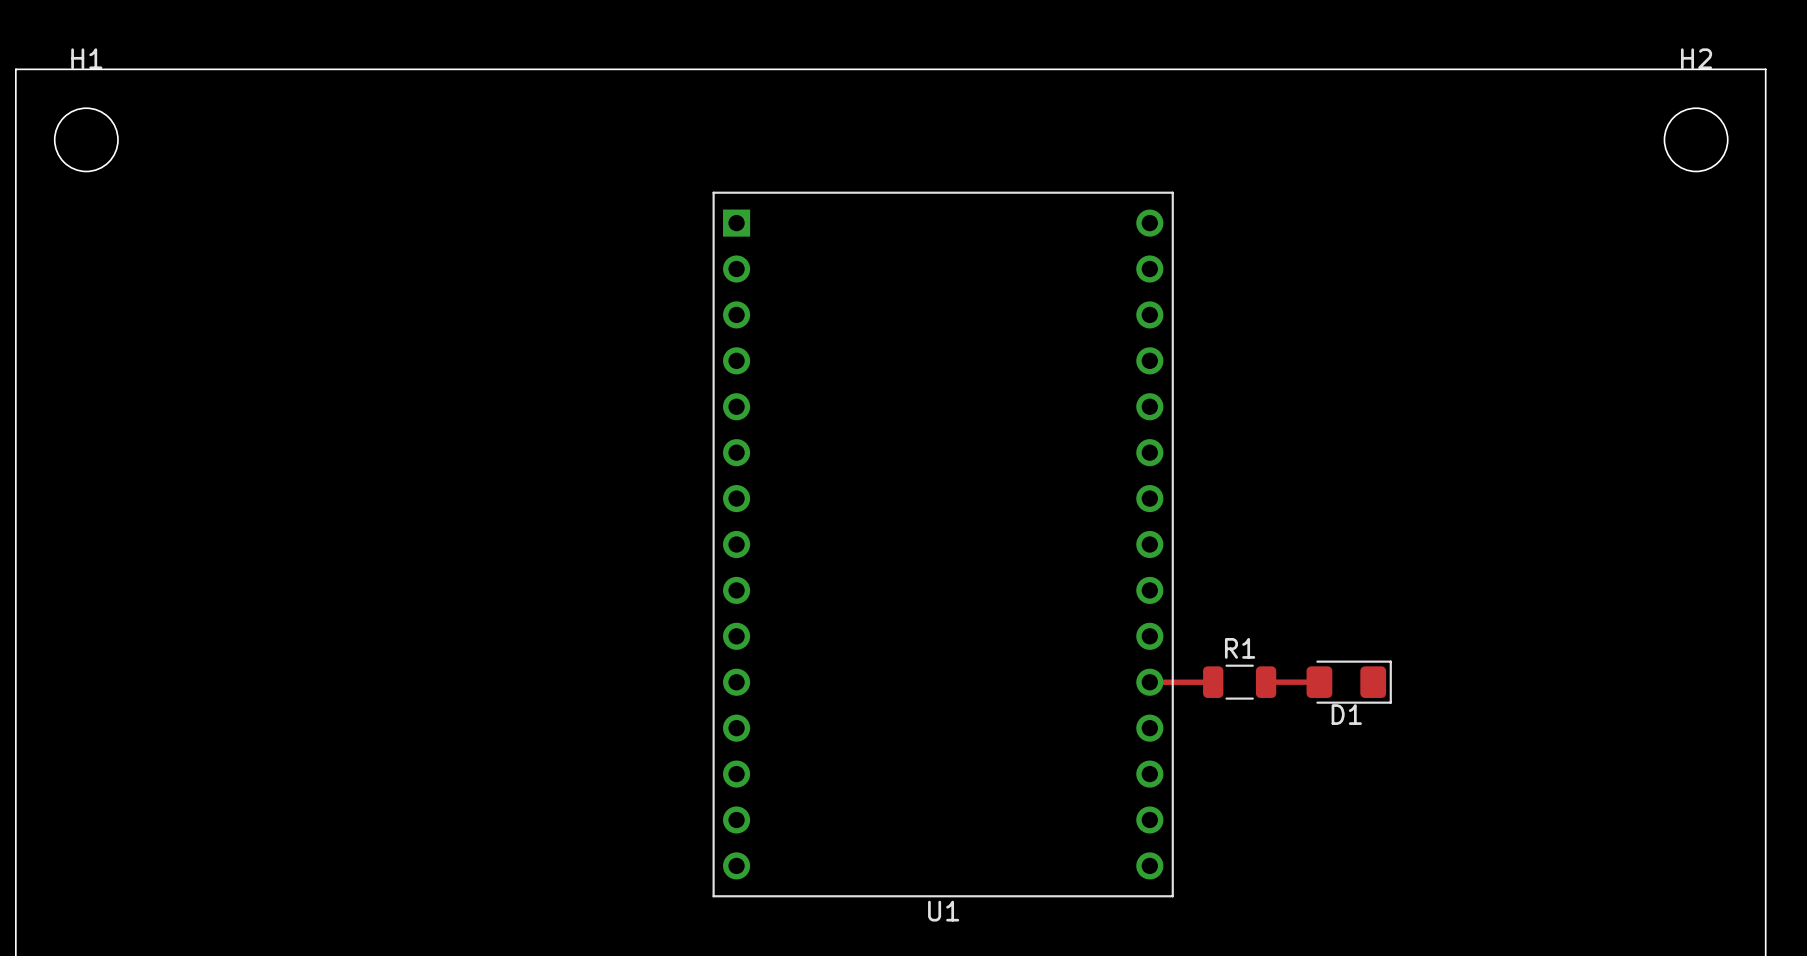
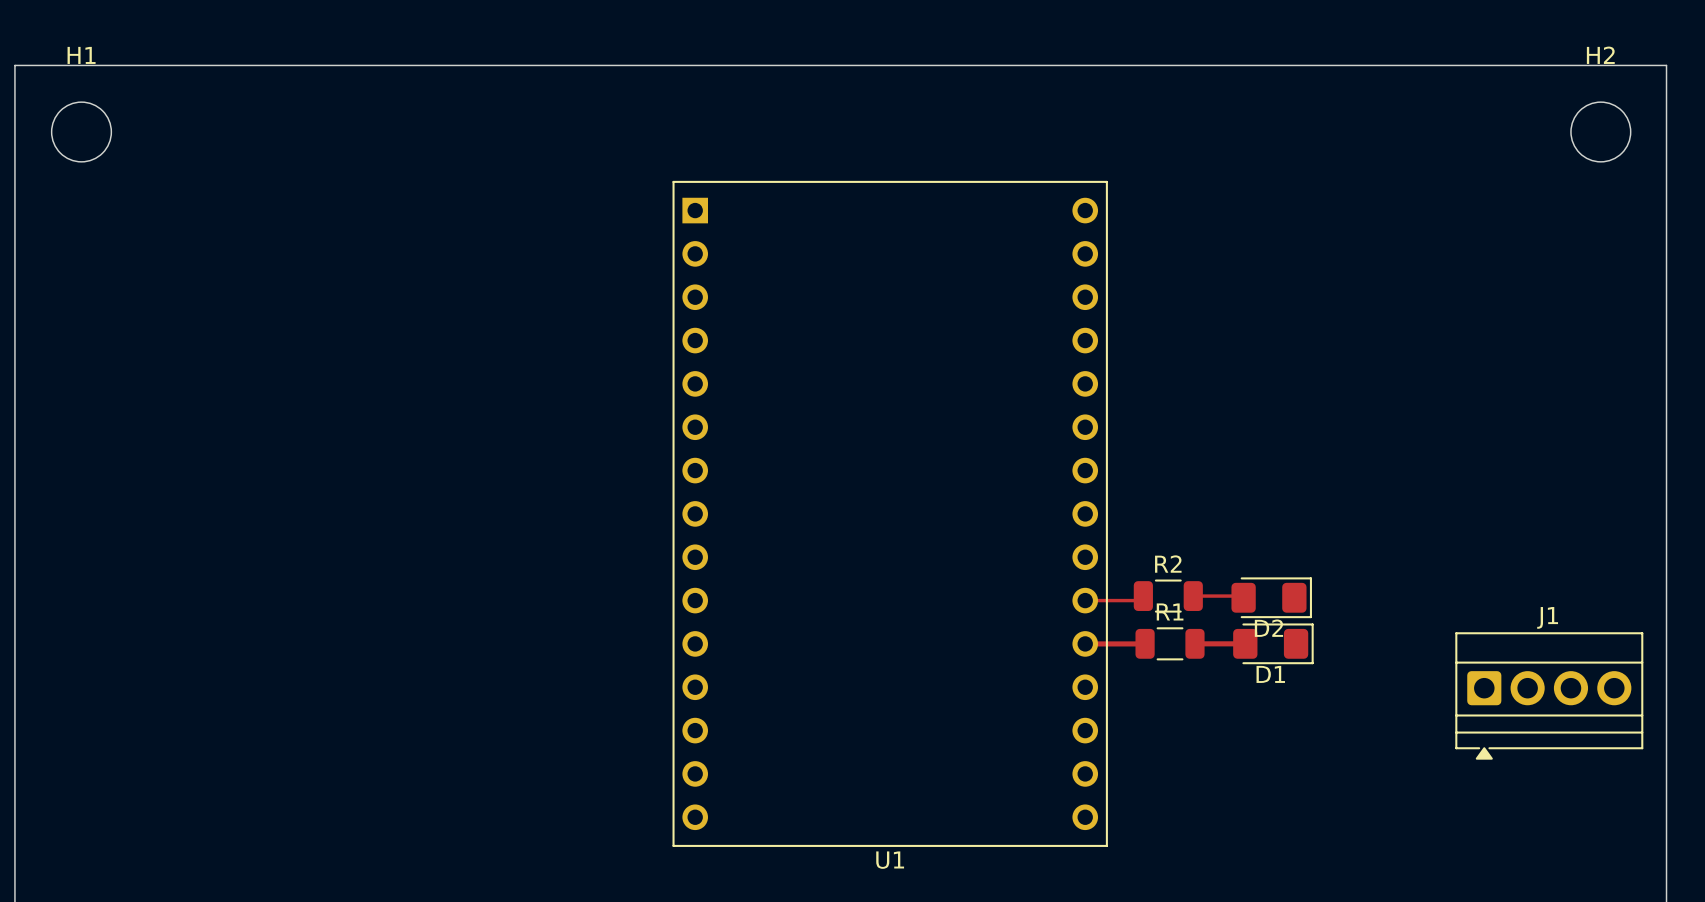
top track: none -> (1143, 596) (1138, 600) (1085, 600)
R2: none -> (1168, 596)
top track: none -> (1193, 596) (1241, 596) (1243, 597)
D2: none -> (1271, 597)
J1: none -> (1549, 695)

